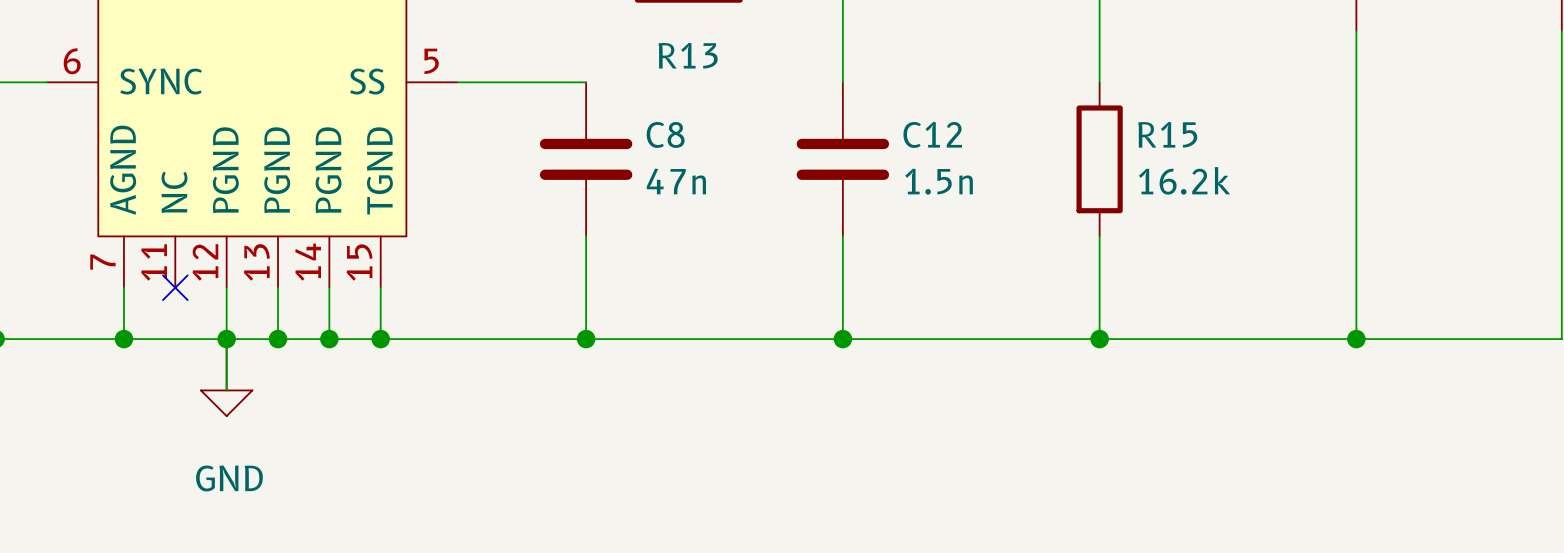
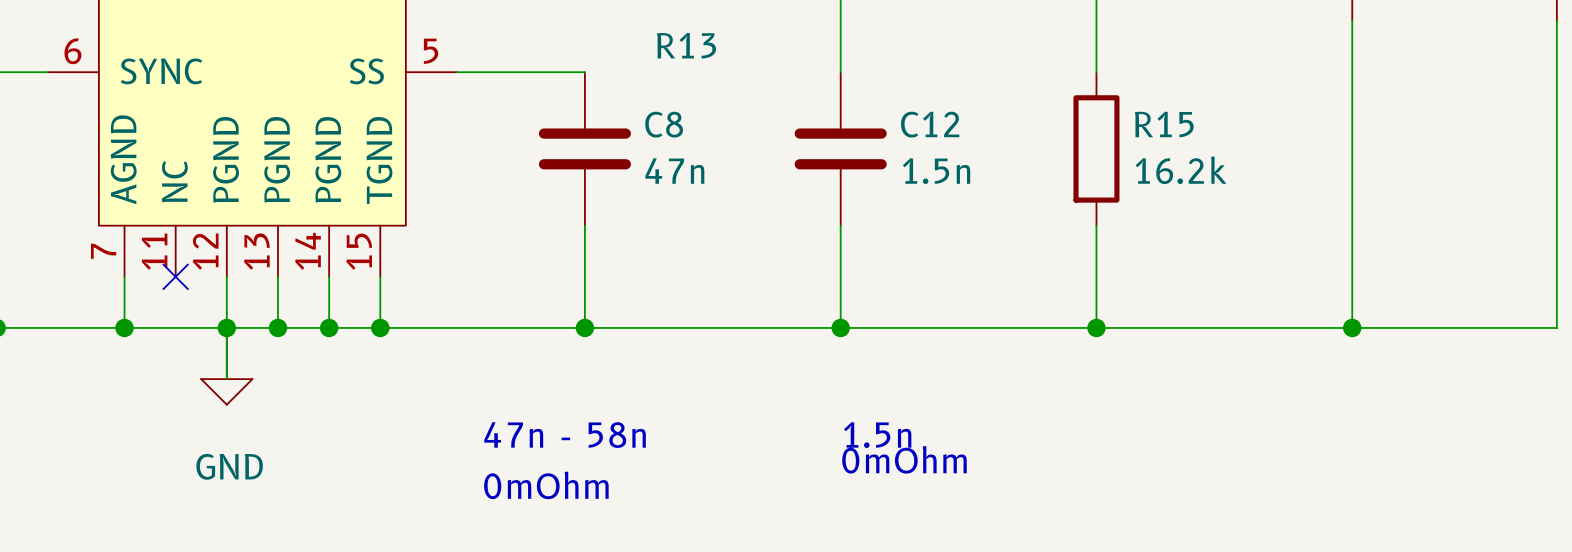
text: none -> 47n - 58n (565, 435)
text: none -> 1.5n (877, 435)
text: none -> 0mOhm (904, 459)
text: none -> 0mOhm (546, 485)

